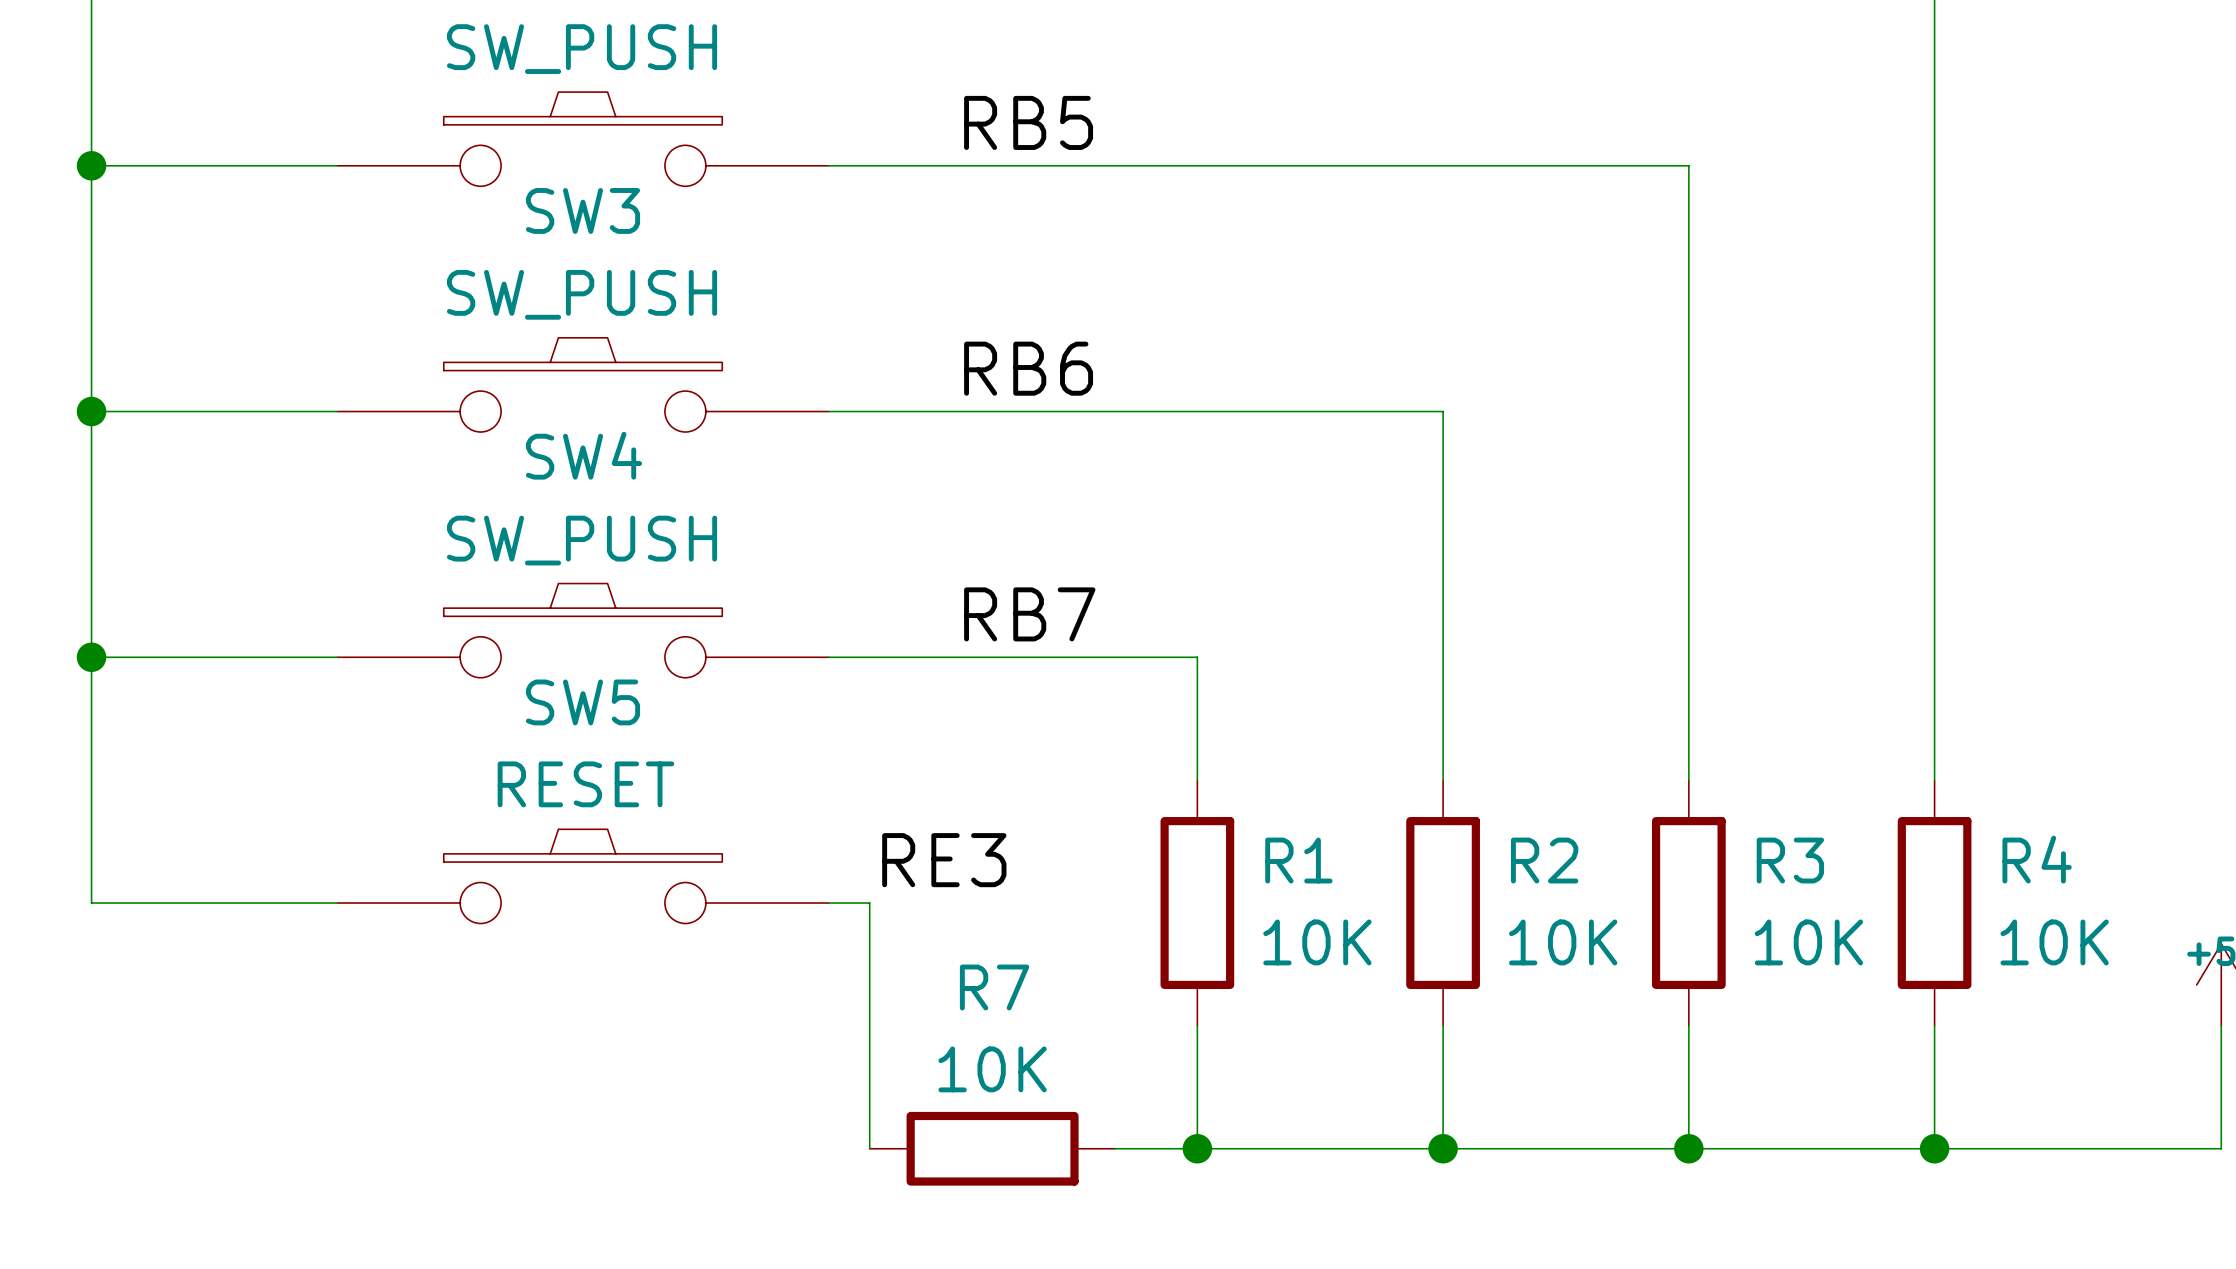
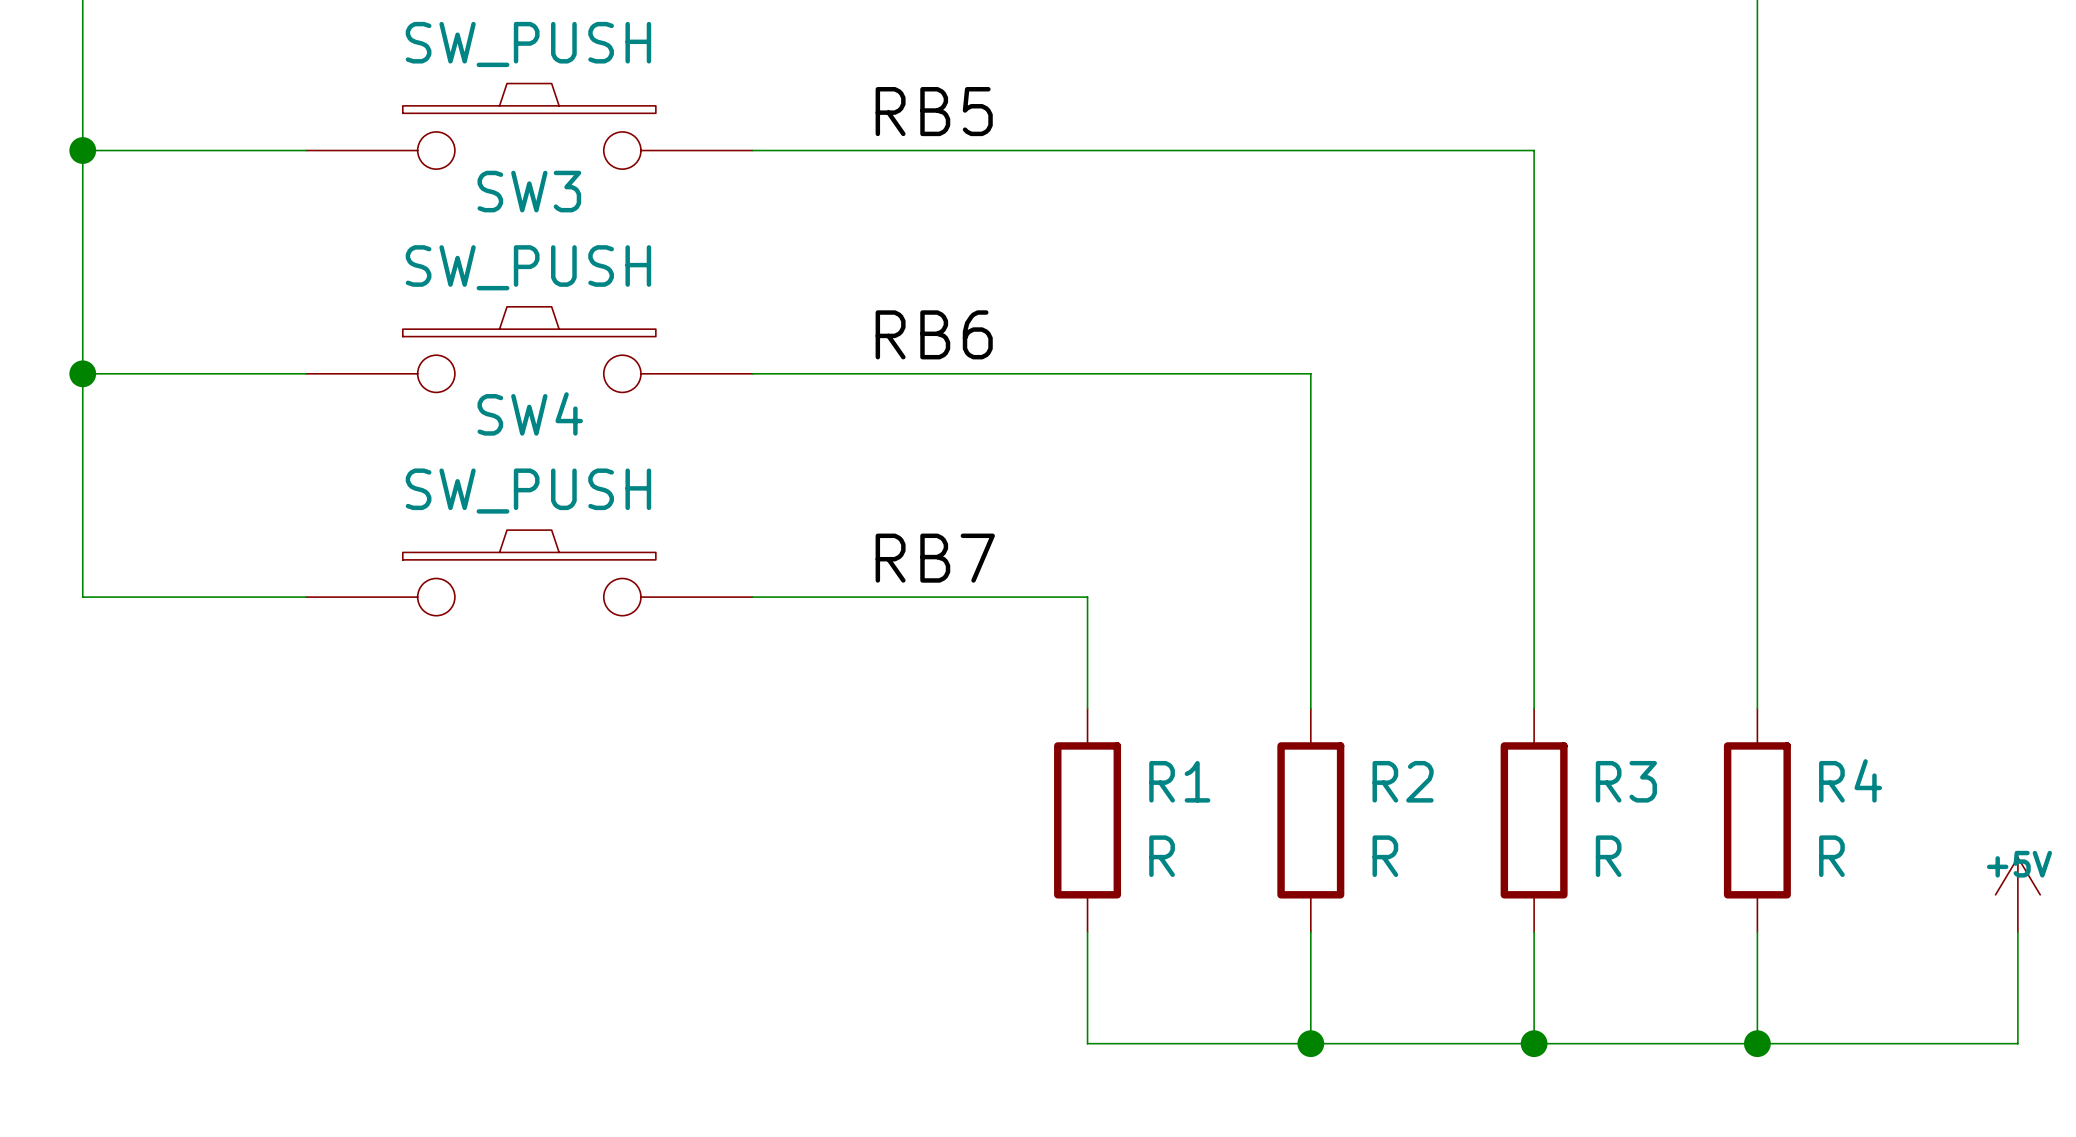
wire: (91, 657) (91, 903) (337, 903) -> none
junction: (91, 657) -> none
label: RE3 (944, 860) -> none
SW5: RESET (583, 876) -> none
wire: (828, 903) (869, 903) (869, 1148) -> none
R1 value: 10K (1317, 942) -> R (1162, 856)
R2 value: 10K (1563, 942) -> R (1385, 856)
R3 value: 10K (1808, 942) -> R (1608, 856)
R4 value: 10K (2054, 942) -> R (1831, 856)
R7: 10K (992, 1148) -> none
wire: (1115, 1148) (1197, 1148) -> none
junction: (1197, 1148) -> none

